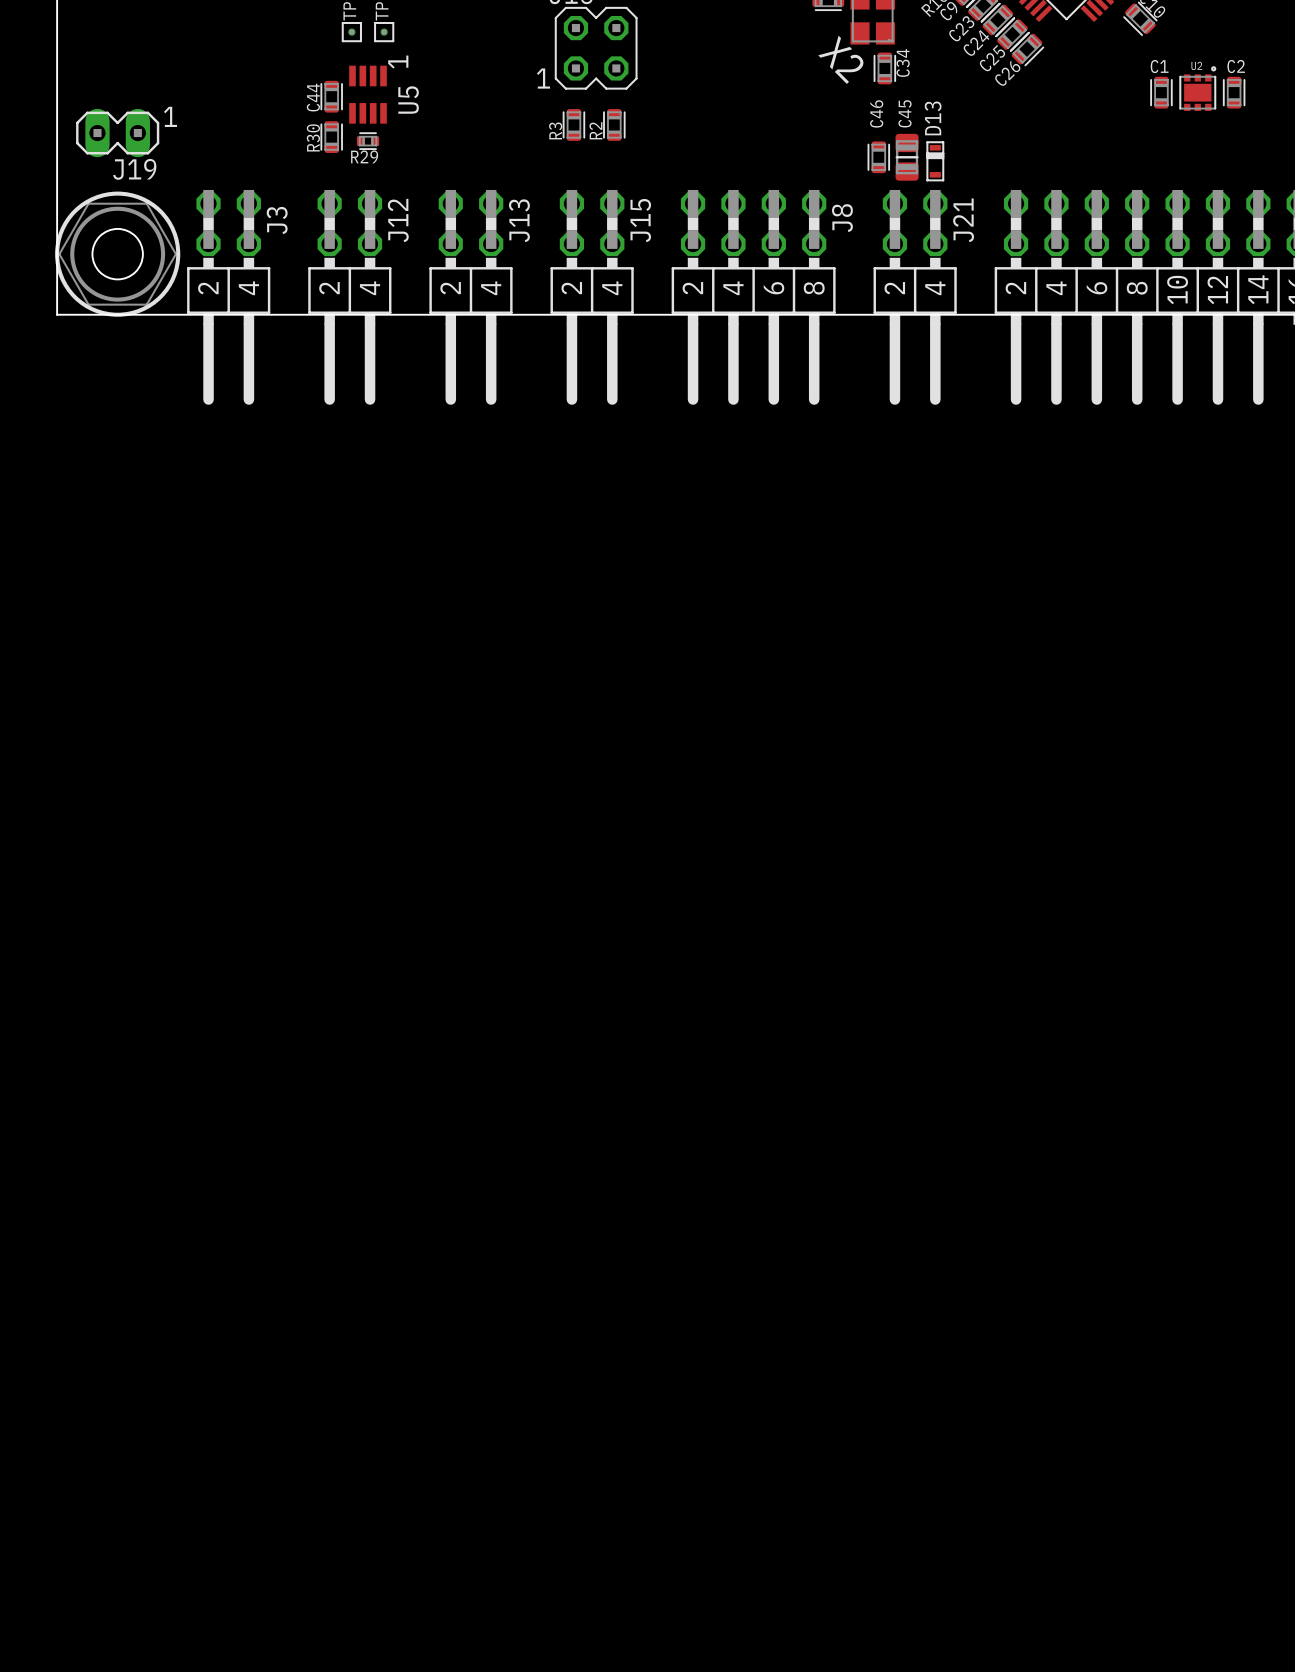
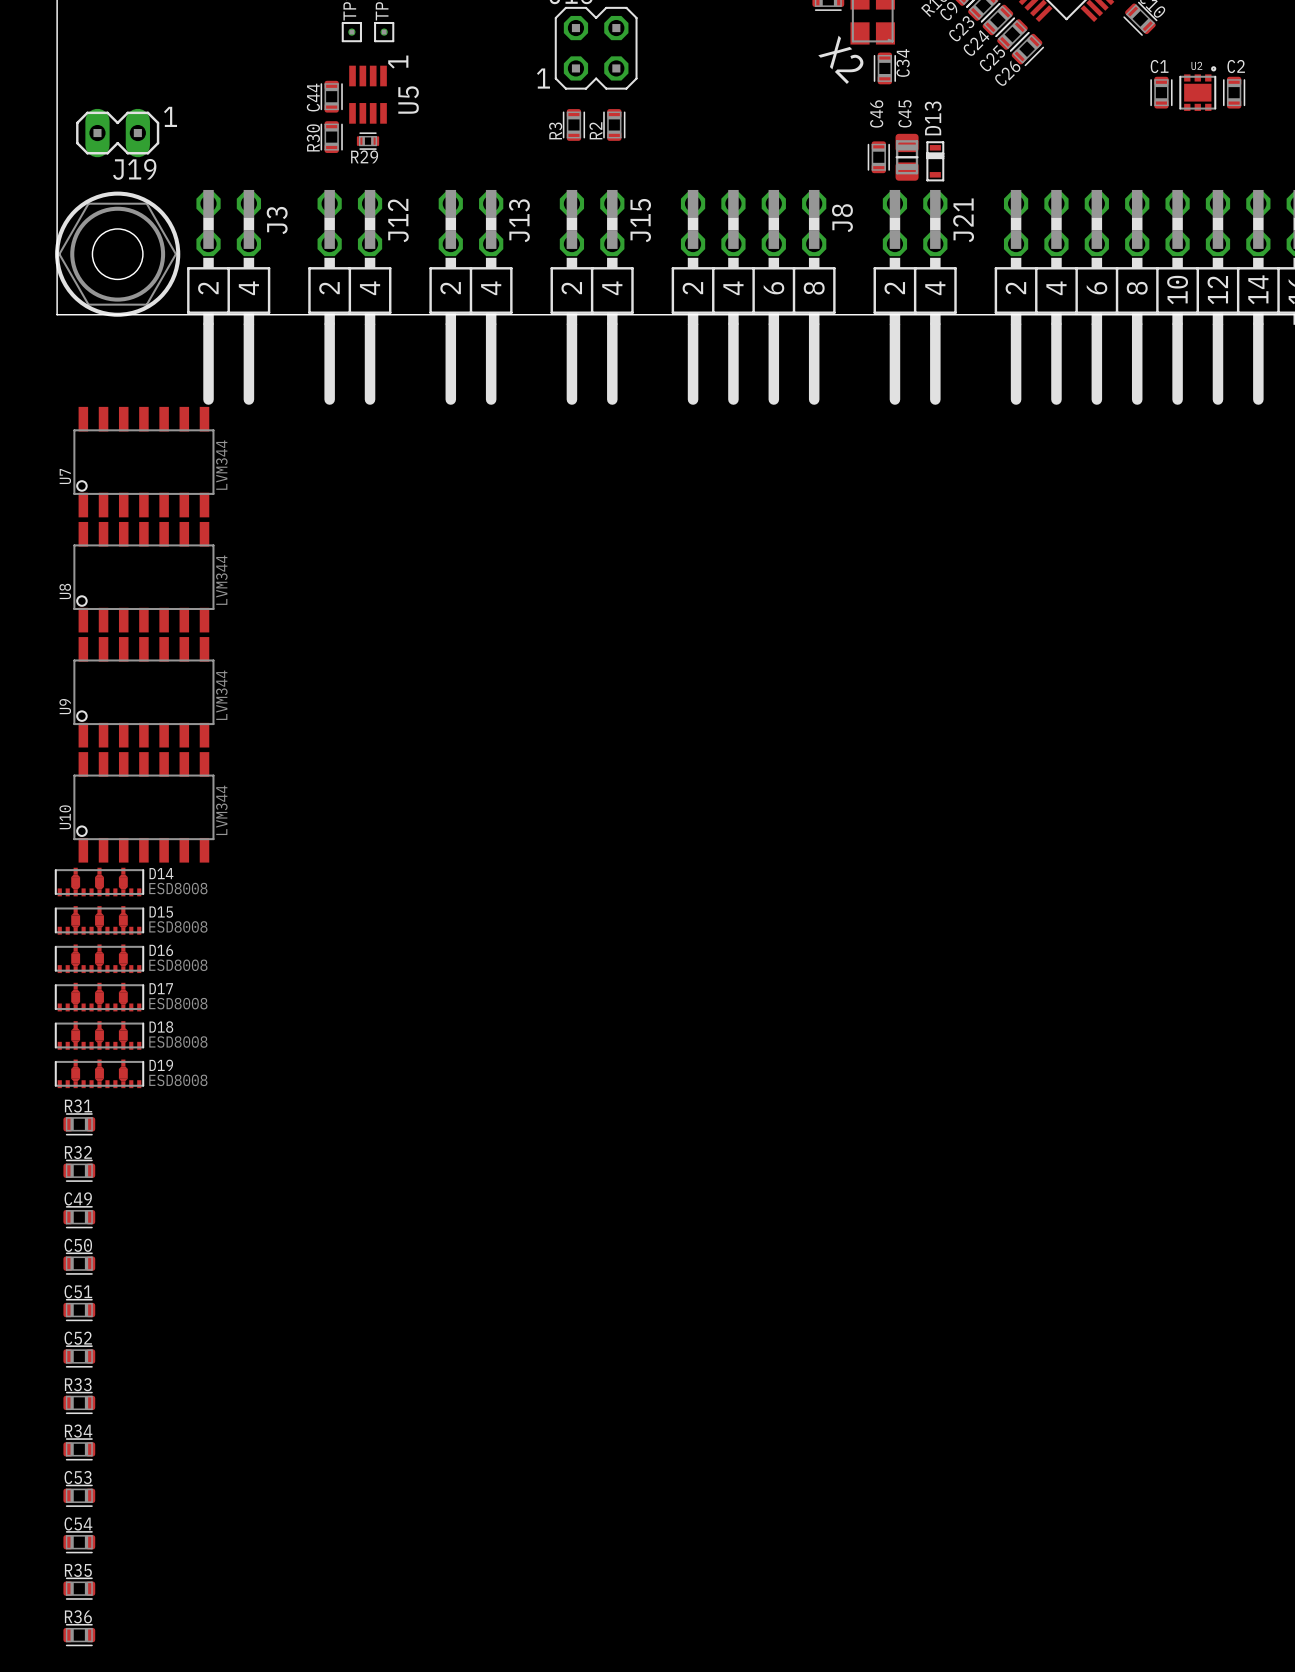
U7: none -> LVM344 (143, 462)
U8: none -> LVM344 (143, 577)
U9: none -> LVM344 (143, 692)
U10: none -> LVM344 (143, 807)
D14: none -> ESD8008 (99, 882)
D15: none -> ESD8008 (99, 920)
D16: none -> ESD8008 (99, 958)
D17: none -> ESD8008 (99, 997)
D18: none -> ESD8008 (99, 1035)
D19: none -> ESD8008 (99, 1073)
R31: none -> (79, 1124)
R32: none -> (79, 1170)
C49: none -> (79, 1217)
C50: none -> (79, 1263)
C51: none -> (79, 1310)
C52: none -> (79, 1356)
R33: none -> (79, 1402)
R34: none -> (79, 1449)
C53: none -> (79, 1495)
C54: none -> (79, 1542)
R35: none -> (79, 1588)
R36: none -> (79, 1635)

